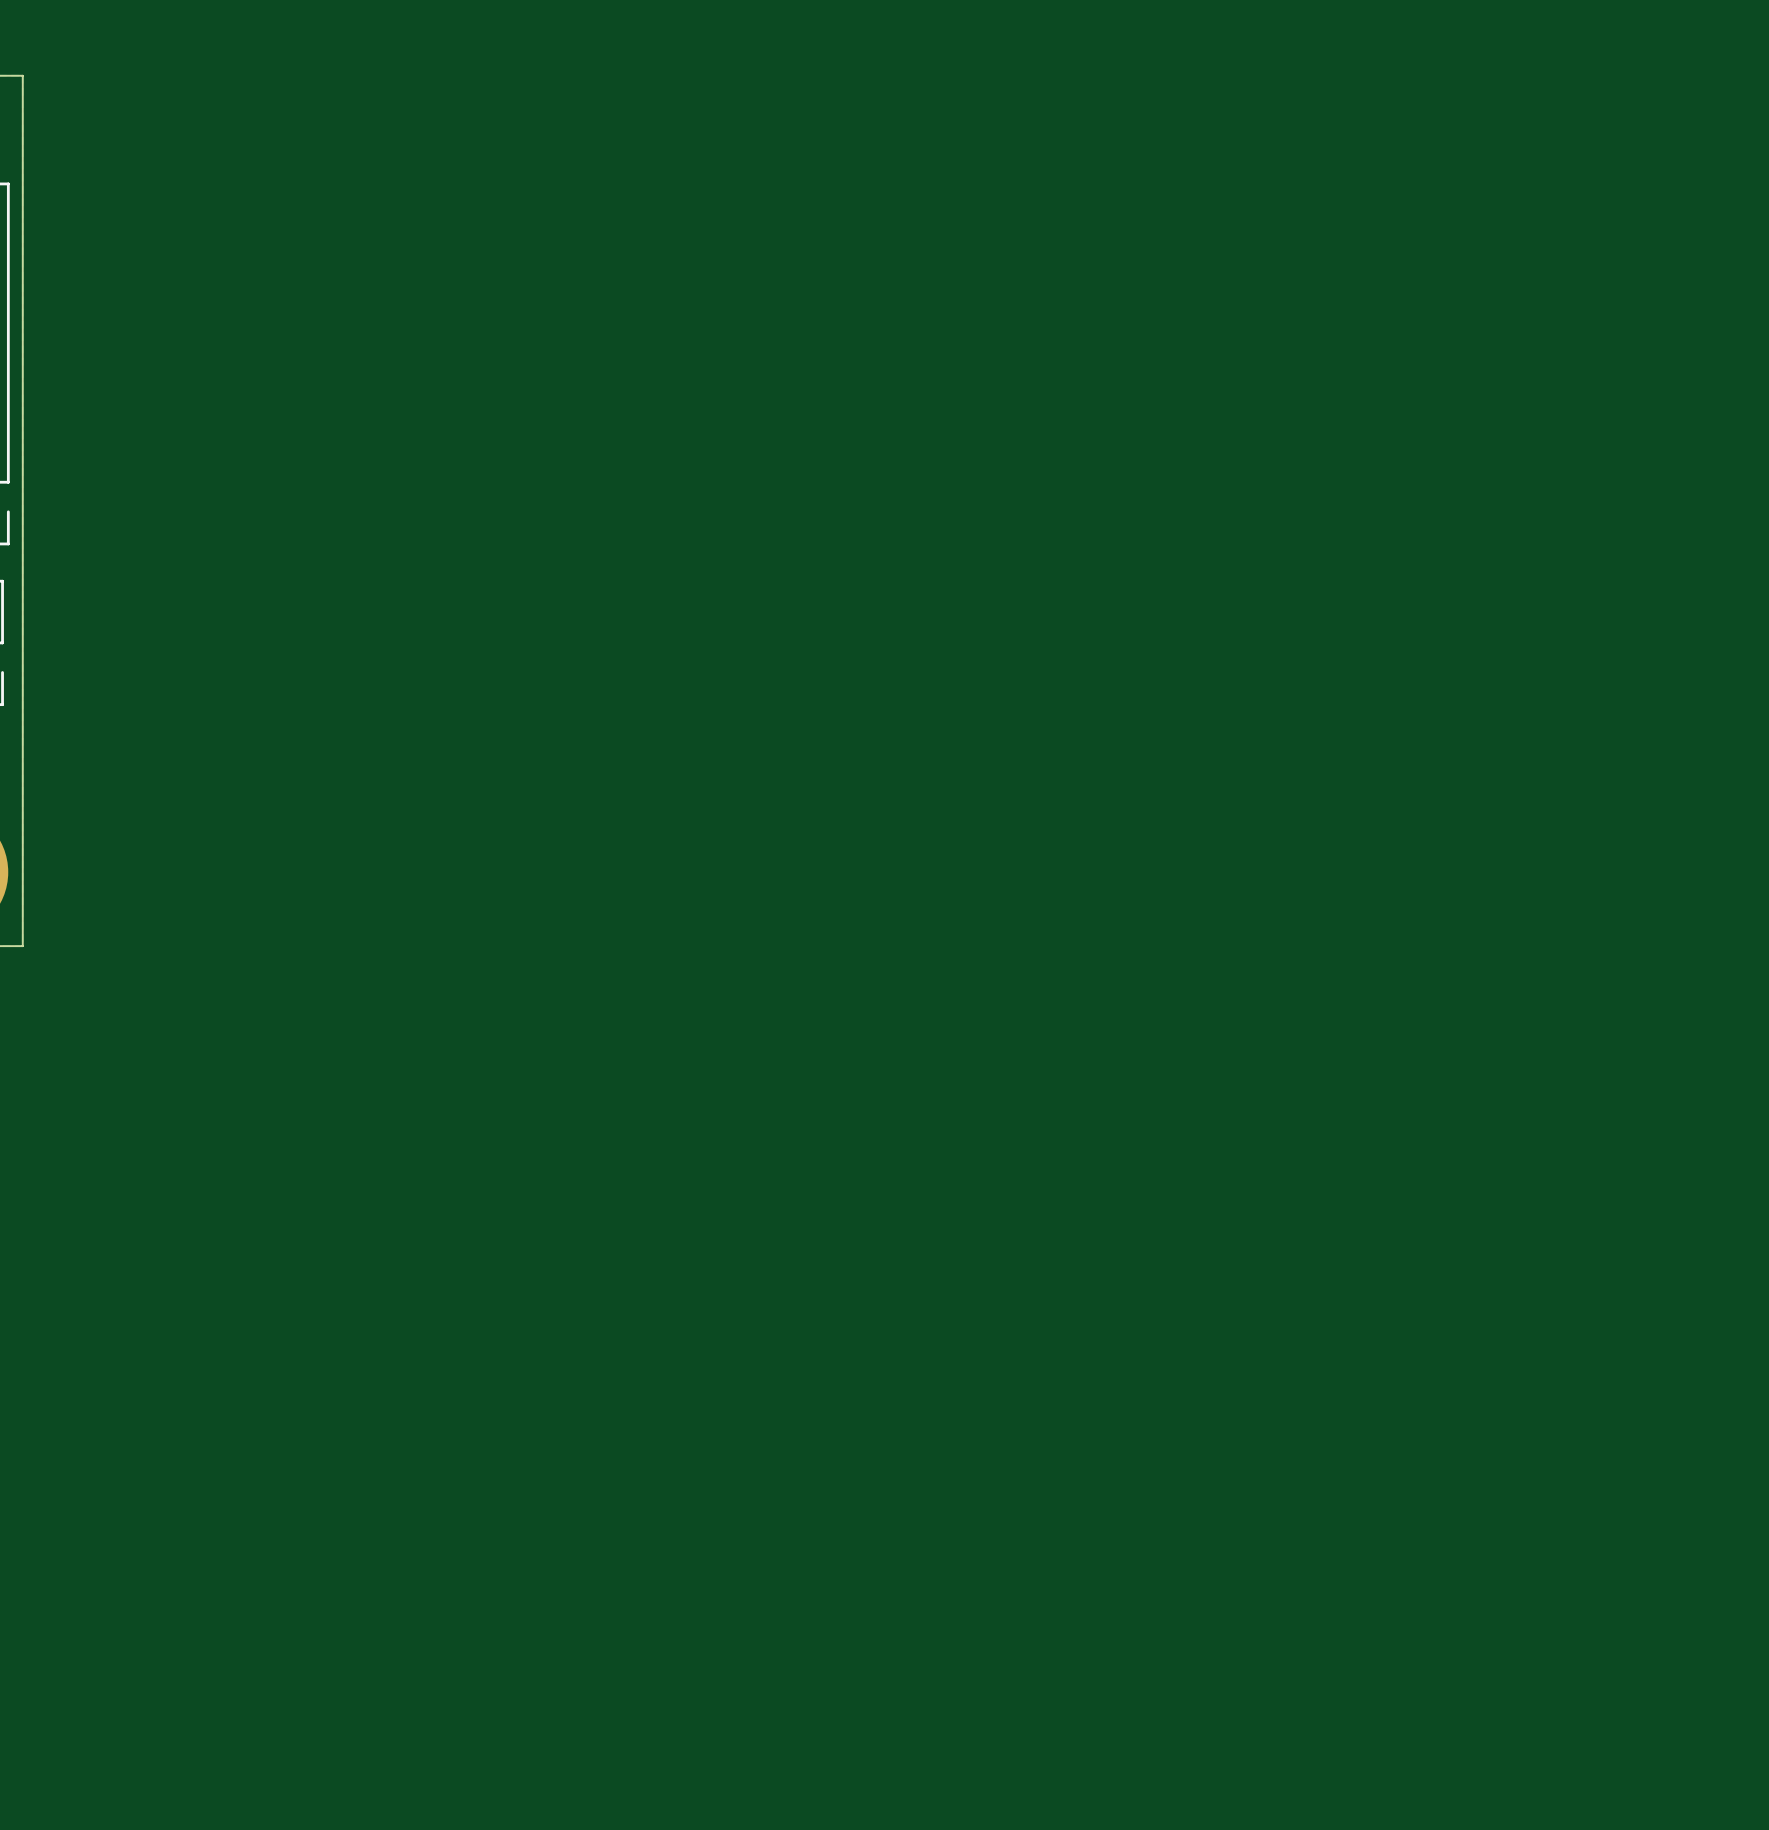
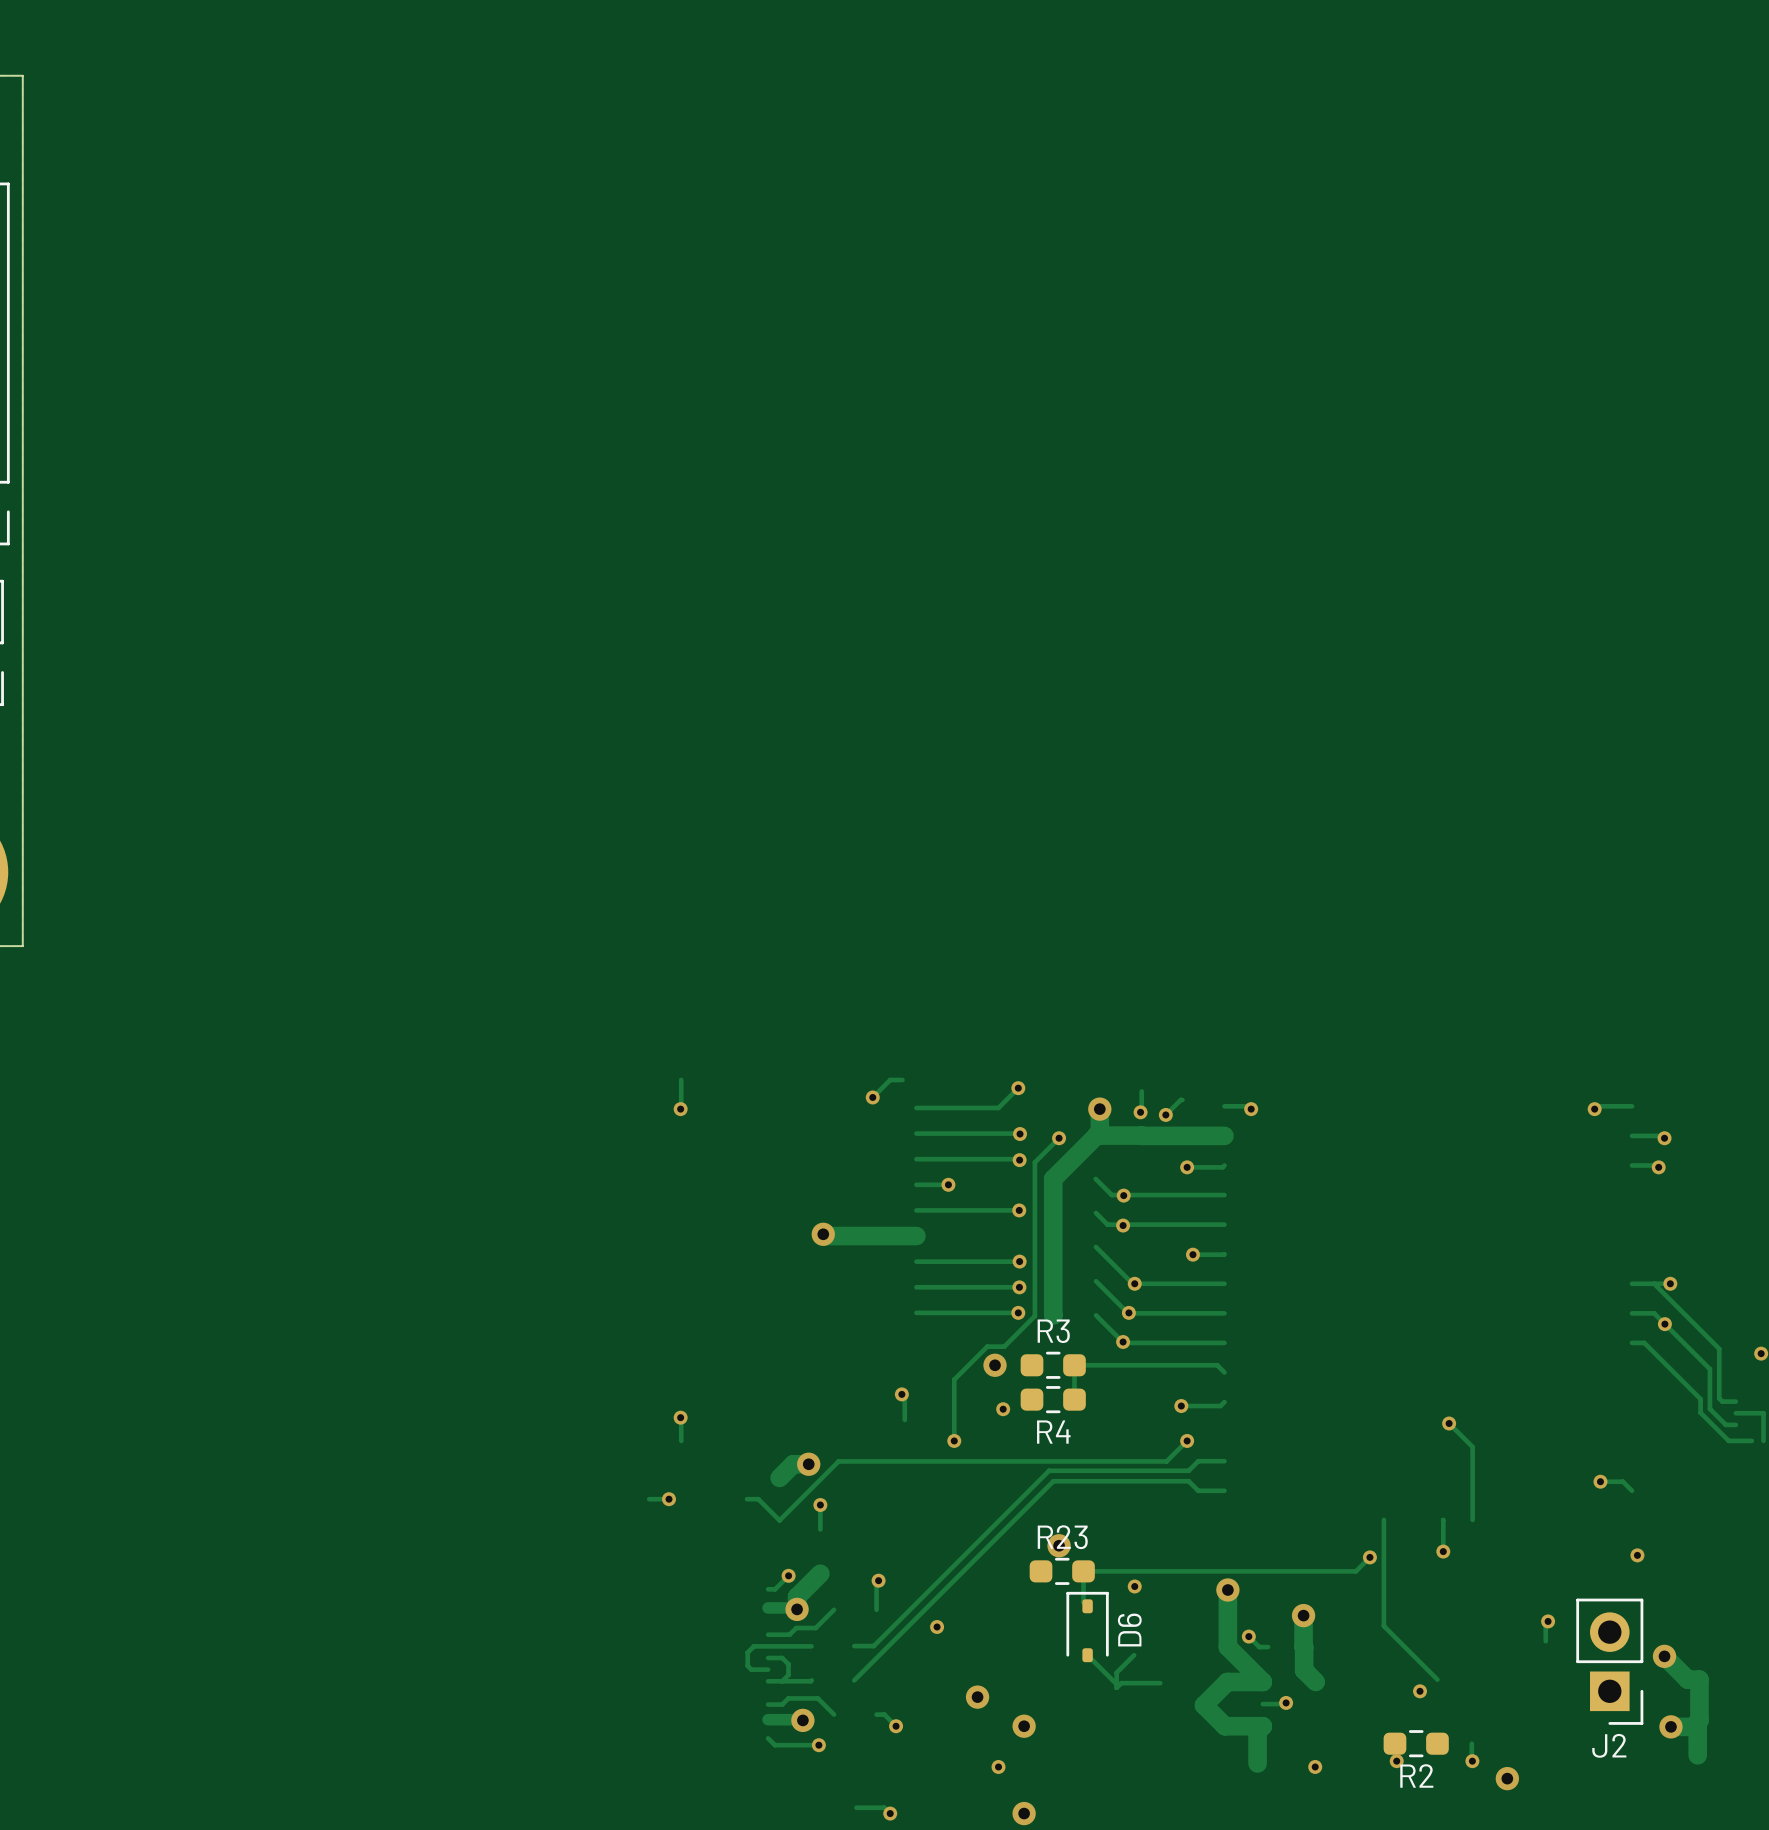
track: none -> (681, 1080) (680, 1109)
track: none -> (902, 1080) (890, 1080) (872, 1097)
track: none -> (1018, 1088) (998, 1107) (916, 1107)
via: none -> (1018, 1088)
track: none -> (1141, 1091) (1140, 1112)
via: none -> (872, 1097)
track: none -> (1182, 1099) (1165, 1114)
track: none -> (1224, 1106) (1248, 1106) (1251, 1109)
track: none -> (1632, 1106) (1597, 1106) (1594, 1109)
via: none -> (680, 1109)
track: none -> (1099, 1109) (1099, 1132) (1053, 1178) (1053, 1315)
via: none -> (1099, 1109)
via: none -> (1251, 1109)
via: none -> (1594, 1109)
via: none -> (1140, 1112)
via: none -> (1165, 1114)
track: none -> (916, 1133) (1020, 1134)
via: none -> (1020, 1134)
track: none -> (1096, 1135) (1141, 1135)
track: none -> (1142, 1135) (1224, 1135)
track: none -> (1632, 1135) (1662, 1135) (1664, 1138)
track: none -> (1059, 1138) (1034, 1162) (1034, 1316) (1004, 1346) (987, 1346) (954, 1379) (954, 1440)
via: none -> (1059, 1138)
via: none -> (1664, 1138)
track: none -> (916, 1159) (1019, 1160)
via: none -> (1019, 1160)
track: none -> (1224, 1165) (1222, 1167) (1187, 1167)
track: none -> (1632, 1165) (1656, 1165) (1658, 1167)
via: none -> (1187, 1167)
via: none -> (1658, 1167)
track: none -> (1095, 1178) (1111, 1195) (1224, 1195)
track: none -> (916, 1184) (948, 1184)
via: none -> (948, 1184)
via: none -> (1123, 1195)
track: none -> (916, 1210) (1019, 1210)
via: none -> (1019, 1210)
track: none -> (1095, 1212) (1107, 1224) (1224, 1224)
via: none -> (1123, 1225)
track: none -> (823, 1234) (825, 1236) (916, 1236)
via: none -> (823, 1234)
track: none -> (1095, 1246) (1132, 1283) (1224, 1283)
via: none -> (1192, 1254)
track: none -> (1224, 1254) (1192, 1254)
track: none -> (916, 1261) (1019, 1261)
via: none -> (1019, 1261)
track: none -> (1096, 1281) (1128, 1313) (1224, 1313)
via: none -> (1134, 1283)
track: none -> (1632, 1283) (1670, 1283)
track: none -> (1654, 1283) (1719, 1348) (1719, 1398) (1722, 1401) (1735, 1401)
via: none -> (1670, 1283)
track: none -> (916, 1287) (1019, 1287)
via: none -> (1019, 1287)
track: none -> (916, 1312) (1018, 1312)
via: none -> (1018, 1312)
via: none -> (1128, 1312)
track: none -> (1632, 1313) (1654, 1313) (1709, 1369) (1709, 1408) (1725, 1424) (1735, 1424)
track: none -> (1096, 1315) (1123, 1342) (1224, 1342)
via: none -> (1664, 1324)
via: none -> (1123, 1341)
track: none -> (1632, 1342) (1644, 1342) (1700, 1399) (1700, 1412) (1728, 1440) (1751, 1440)
via: none -> (1761, 1353)
via: none -> (995, 1365)
R3: none -> (1053, 1365)
track: none -> (1224, 1372) (1217, 1365) (1074, 1365) (1074, 1399)
track: none -> (901, 1394) (904, 1397) (904, 1420)
via: none -> (901, 1394)
R4: none -> (1053, 1399)
track: none -> (1224, 1402) (1220, 1406) (1181, 1406)
via: none -> (1181, 1406)
via: none -> (1003, 1409)
track: none -> (1735, 1413) (1763, 1413) (1763, 1440)
track: none -> (680, 1417) (681, 1440)
via: none -> (680, 1417)
track: none -> (1449, 1423) (1472, 1447) (1472, 1519)
via: none -> (1449, 1423)
via: none -> (954, 1440)
track: none -> (1187, 1440) (1166, 1461) (838, 1461) (779, 1520) (758, 1499) (747, 1499)
via: none -> (1187, 1440)
track: none -> (1224, 1461) (1198, 1461) (1188, 1470) (1049, 1470) (873, 1646) (854, 1646)
track: none -> (808, 1464) (793, 1464) (779, 1477)
via: none -> (808, 1464)
track: none -> (1600, 1481) (1622, 1481) (1632, 1490)
via: none -> (1600, 1481)
track: none -> (1224, 1490) (1198, 1490) (1188, 1481) (1053, 1481) (854, 1680)
track: none -> (649, 1499) (669, 1499)
via: none -> (669, 1499)
track: none -> (820, 1505) (820, 1529)
via: none -> (820, 1505)
track: none -> (1383, 1519) (1383, 1626) (1437, 1679)
track: none -> (1443, 1520) (1443, 1551)
via: none -> (1059, 1545)
via: none -> (1443, 1551)
via: none -> (1637, 1555)
track: none -> (1369, 1557) (1355, 1571) (1083, 1571) (1083, 1602) (1087, 1606)
via: none -> (1369, 1557)
R23: none -> (1062, 1571)
track: none -> (820, 1573) (797, 1596) (797, 1609) (795, 1607) (768, 1607)
track: none -> (788, 1575) (775, 1589) (768, 1589)
via: none -> (788, 1575)
track: none -> (878, 1580) (876, 1582) (876, 1609)
via: none -> (878, 1580)
via: none -> (1134, 1586)
track: none -> (1227, 1590) (1227, 1647) (1262, 1681) (1227, 1681) (1204, 1705) (1224, 1726) (1262, 1726) (1257, 1731) (1257, 1763)
via: none -> (1227, 1590)
via: none -> (797, 1609)
track: none -> (834, 1609) (815, 1628) (796, 1628) (789, 1634) (768, 1634)
track: none -> (1303, 1615) (1304, 1670) (1315, 1681)
via: none -> (1303, 1615)
track: none -> (1548, 1621) (1545, 1623) (1545, 1641)
via: none -> (1548, 1621)
via: none -> (937, 1626)
D6: none -> (1087, 1627)
track: none -> (1248, 1636) (1259, 1647) (1268, 1647)
via: none -> (1248, 1636)
track: none -> (811, 1646) (753, 1646) (747, 1652) (747, 1665) (751, 1669) (768, 1669)
track: none -> (1087, 1655) (1116, 1684)
track: none -> (1134, 1655) (1116, 1672) (1116, 1687) (1121, 1683) (1160, 1683)
track: none -> (1664, 1656) (1687, 1679) (1699, 1679) (1699, 1720) (1692, 1726) (1670, 1726)
via: none -> (1664, 1656)
track: none -> (768, 1658) (782, 1658) (788, 1664) (788, 1675) (782, 1681)
J2: none -> (1609, 1661)
track: none -> (811, 1680) (768, 1681)
via: none -> (1420, 1691)
via: none -> (977, 1697)
track: none -> (1286, 1702) (1262, 1704)
via: none -> (1286, 1702)
track: none -> (768, 1704) (782, 1704) (788, 1698) (817, 1698) (834, 1714)
track: none -> (876, 1714) (884, 1714) (896, 1726)
track: none -> (768, 1719) (802, 1720)
via: none -> (802, 1720)
track: none -> (1697, 1722) (1697, 1755)
via: none -> (896, 1726)
via: none -> (1024, 1726)
via: none -> (1670, 1726)
track: none -> (768, 1738) (774, 1745) (818, 1745)
R2: none -> (1416, 1743)
track: none -> (1471, 1743) (1472, 1761)
via: none -> (818, 1745)
via: none -> (1396, 1761)
via: none -> (1472, 1761)
via: none -> (998, 1766)
via: none -> (1315, 1766)
via: none -> (1507, 1778)
track: none -> (856, 1807) (884, 1807) (890, 1813)
via: none -> (890, 1813)
via: none -> (1024, 1813)

